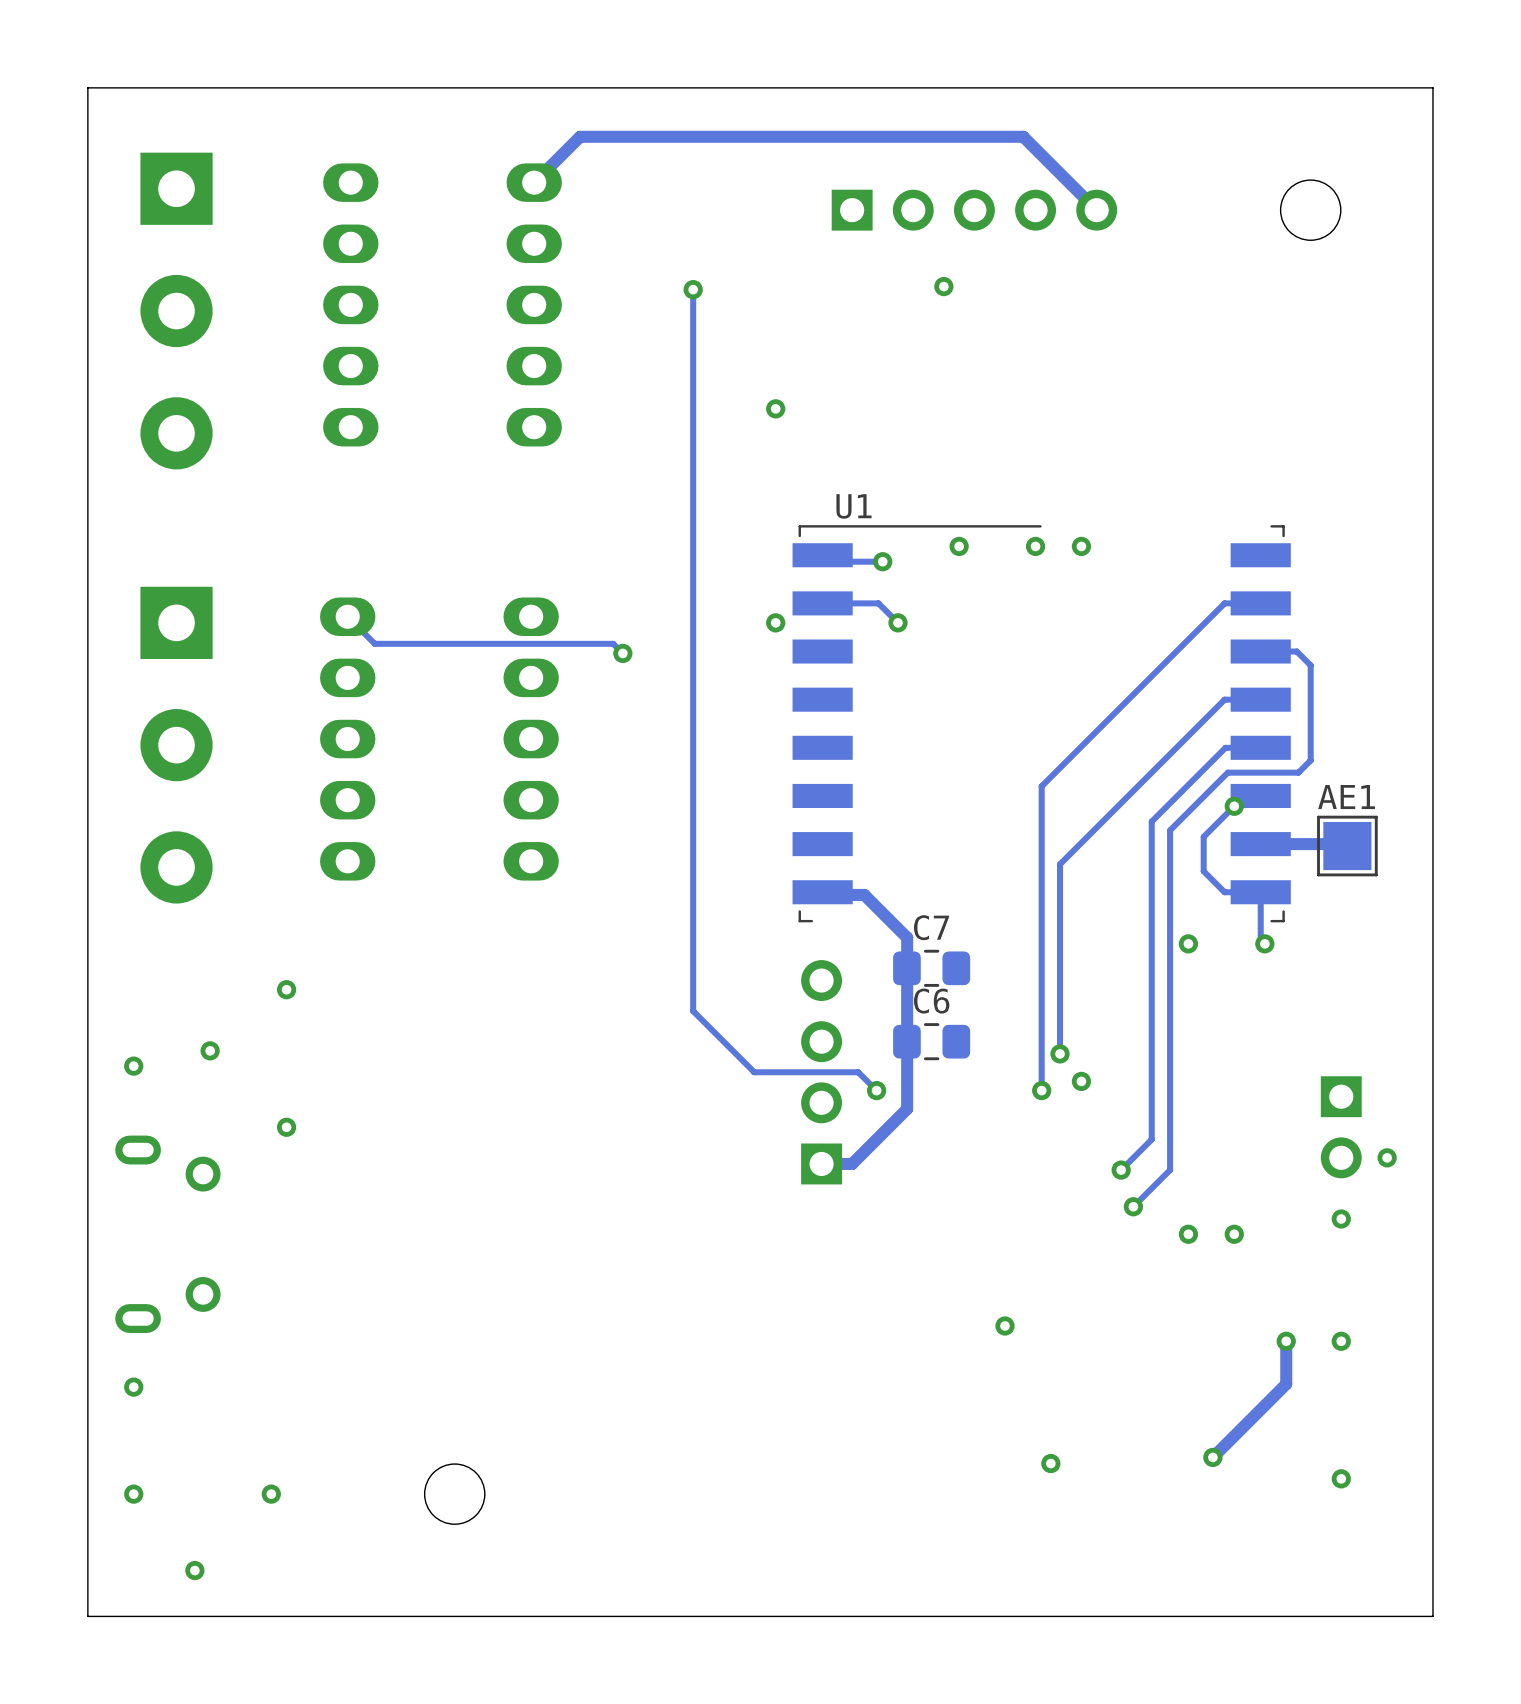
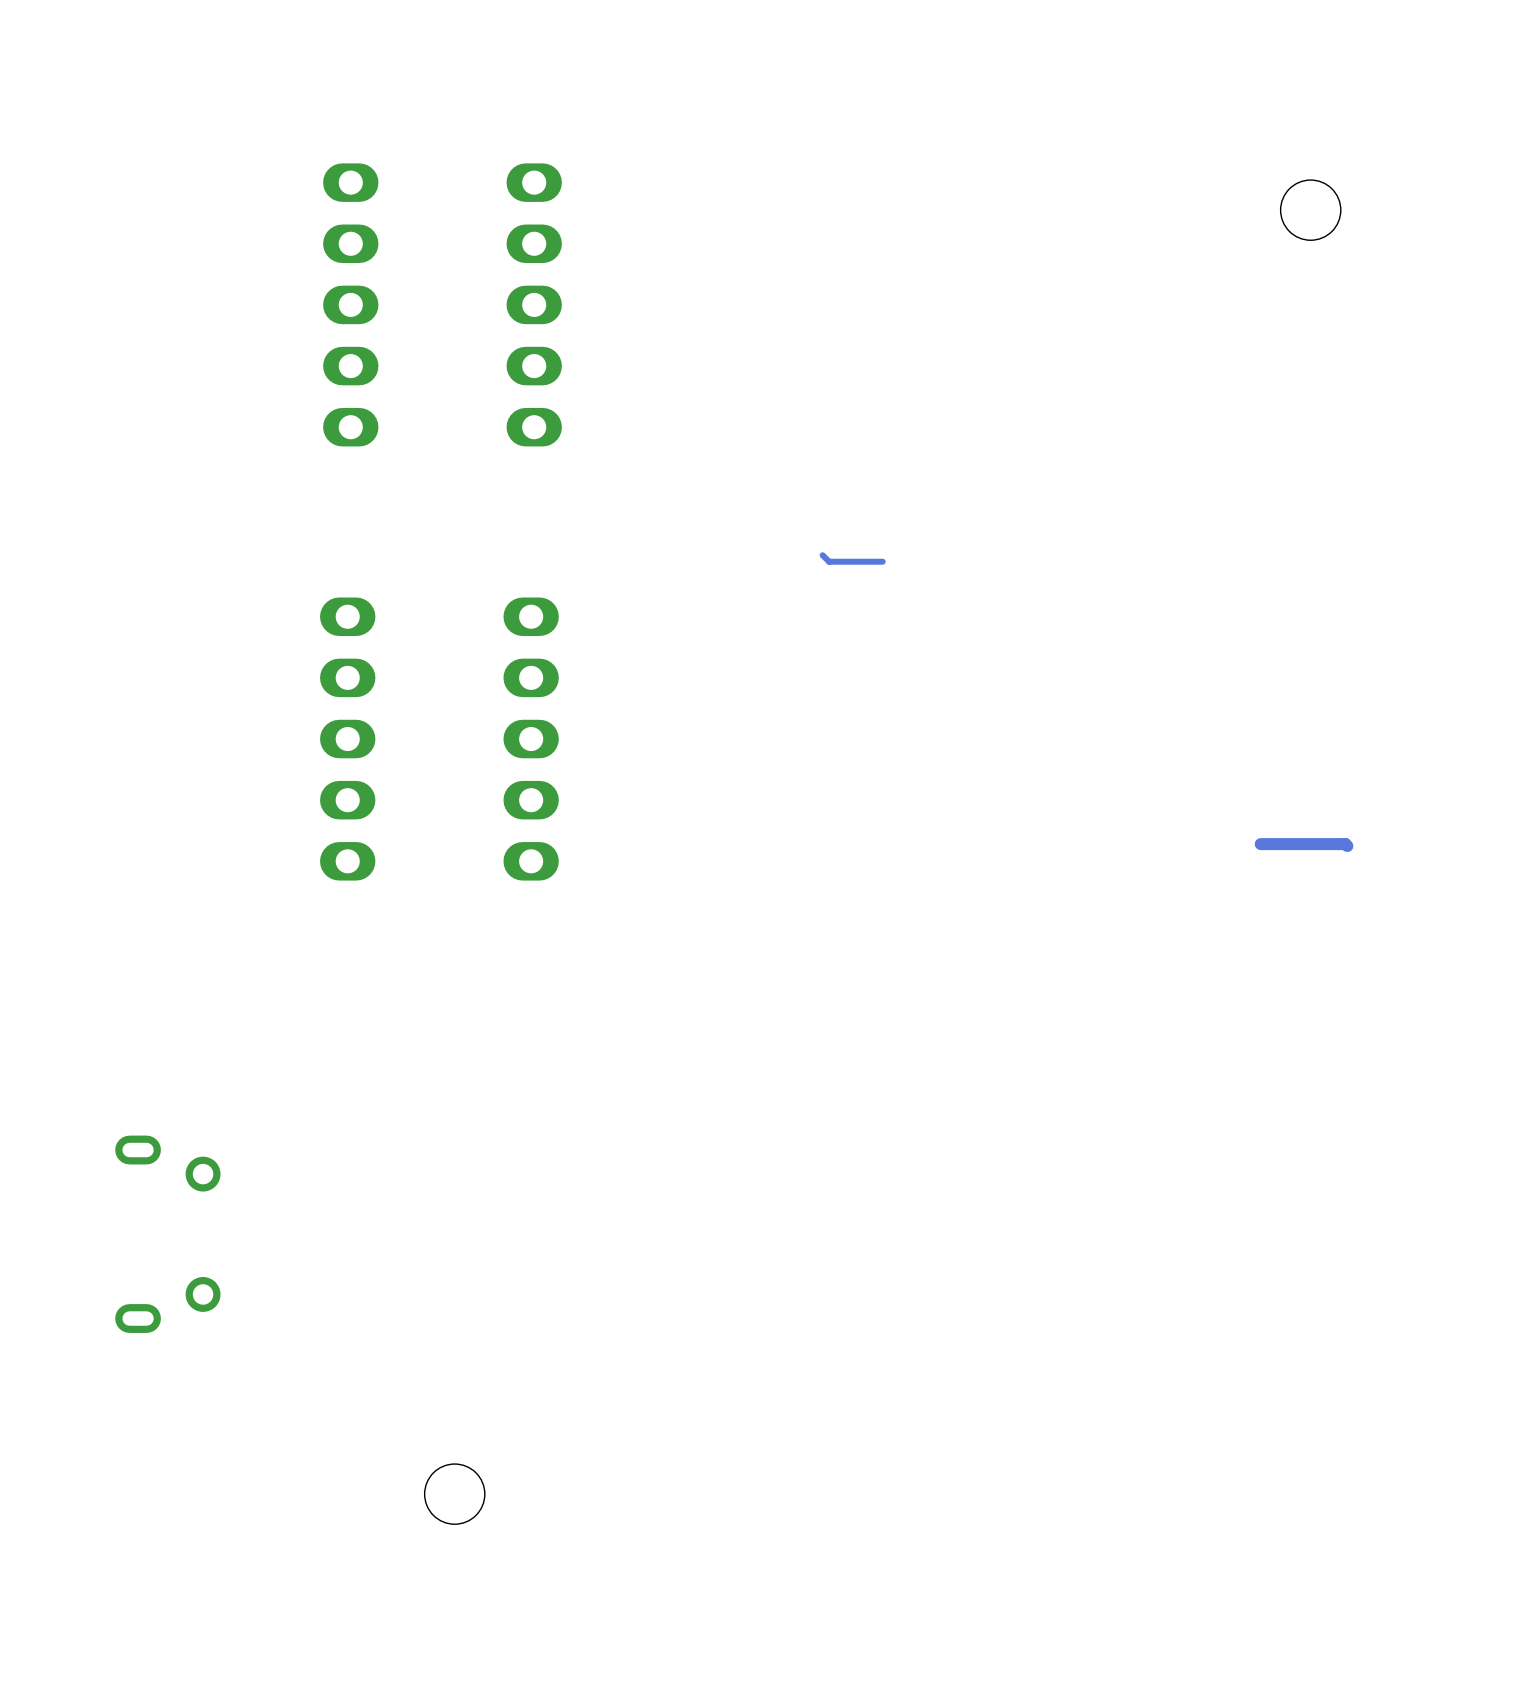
board edge: (1432, 87) (1432, 1616) (87, 1616) (87, 87) (1432, 87) -> none
track: (534, 182) (580, 136) (1023, 136) (1096, 210) -> none
part: (974, 210) -> none
via: (943, 286) -> none
track: (693, 289) (693, 1011) (754, 1072) (858, 1072) (876, 1090) -> none
via: (693, 289) -> none
part: (176, 311) -> none
via: (775, 408) -> none
via: (959, 546) -> none
via: (1035, 546) -> none
via: (1081, 546) -> none
via: (882, 561) -> none
track: (822, 603) (878, 603) (898, 622) -> none
track: (1260, 603) (1224, 603) (1041, 786) (1041, 1090) -> none
track: (347, 616) (374, 643) (613, 643) (622, 653) -> none
via: (775, 622) -> none
via: (898, 622) -> none
track: (1260, 651) (1296, 651) (1310, 665) (1310, 760) (1298, 772) (1227, 772) (1170, 830) (1170, 1170) (1133, 1206) -> none
via: (622, 653) -> none
track: (1260, 699) (1224, 699) (1060, 864) (1060, 1053) -> none
U1: (1041, 723) -> none
part: (176, 745) -> none
track: (1260, 747) (1225, 747) (1151, 821) (1151, 1139) (1121, 1170) -> none
track: (1260, 795) (1244, 795) (1203, 836) (1203, 871) (1224, 892) (1260, 892) (1260, 939) (1264, 943) -> none
via: (1234, 806) -> none
AE1: (1347, 846) -> none
track: (821, 894) (864, 894) (907, 937) (907, 1108) (852, 1163) (821, 1163) -> none
via: (1188, 943) -> none
via: (1264, 943) -> none
C7: (931, 968) -> none
via: (286, 989) -> none
C6: (931, 1041) -> none
via: (210, 1050) -> none
via: (1060, 1053) -> none
via: (133, 1066) -> none
part: (821, 1072) -> none
via: (1081, 1081) -> none
via: (876, 1090) -> none
via: (1041, 1090) -> none
via: (286, 1127) -> none
part: (1341, 1127) -> none
via: (1387, 1157) -> none
via: (1121, 1170) -> none
via: (1133, 1206) -> none
via: (1341, 1218) -> none
via: (1188, 1234) -> none
via: (1234, 1234) -> none
via: (1004, 1325) -> none
track: (1286, 1341) (1286, 1384) (1212, 1457) -> none
via: (1286, 1341) -> none
via: (1341, 1341) -> none
via: (133, 1387) -> none
via: (1212, 1457) -> none
via: (1050, 1463) -> none
via: (1341, 1478) -> none
via: (133, 1494) -> none
via: (271, 1494) -> none
via: (194, 1570) -> none

